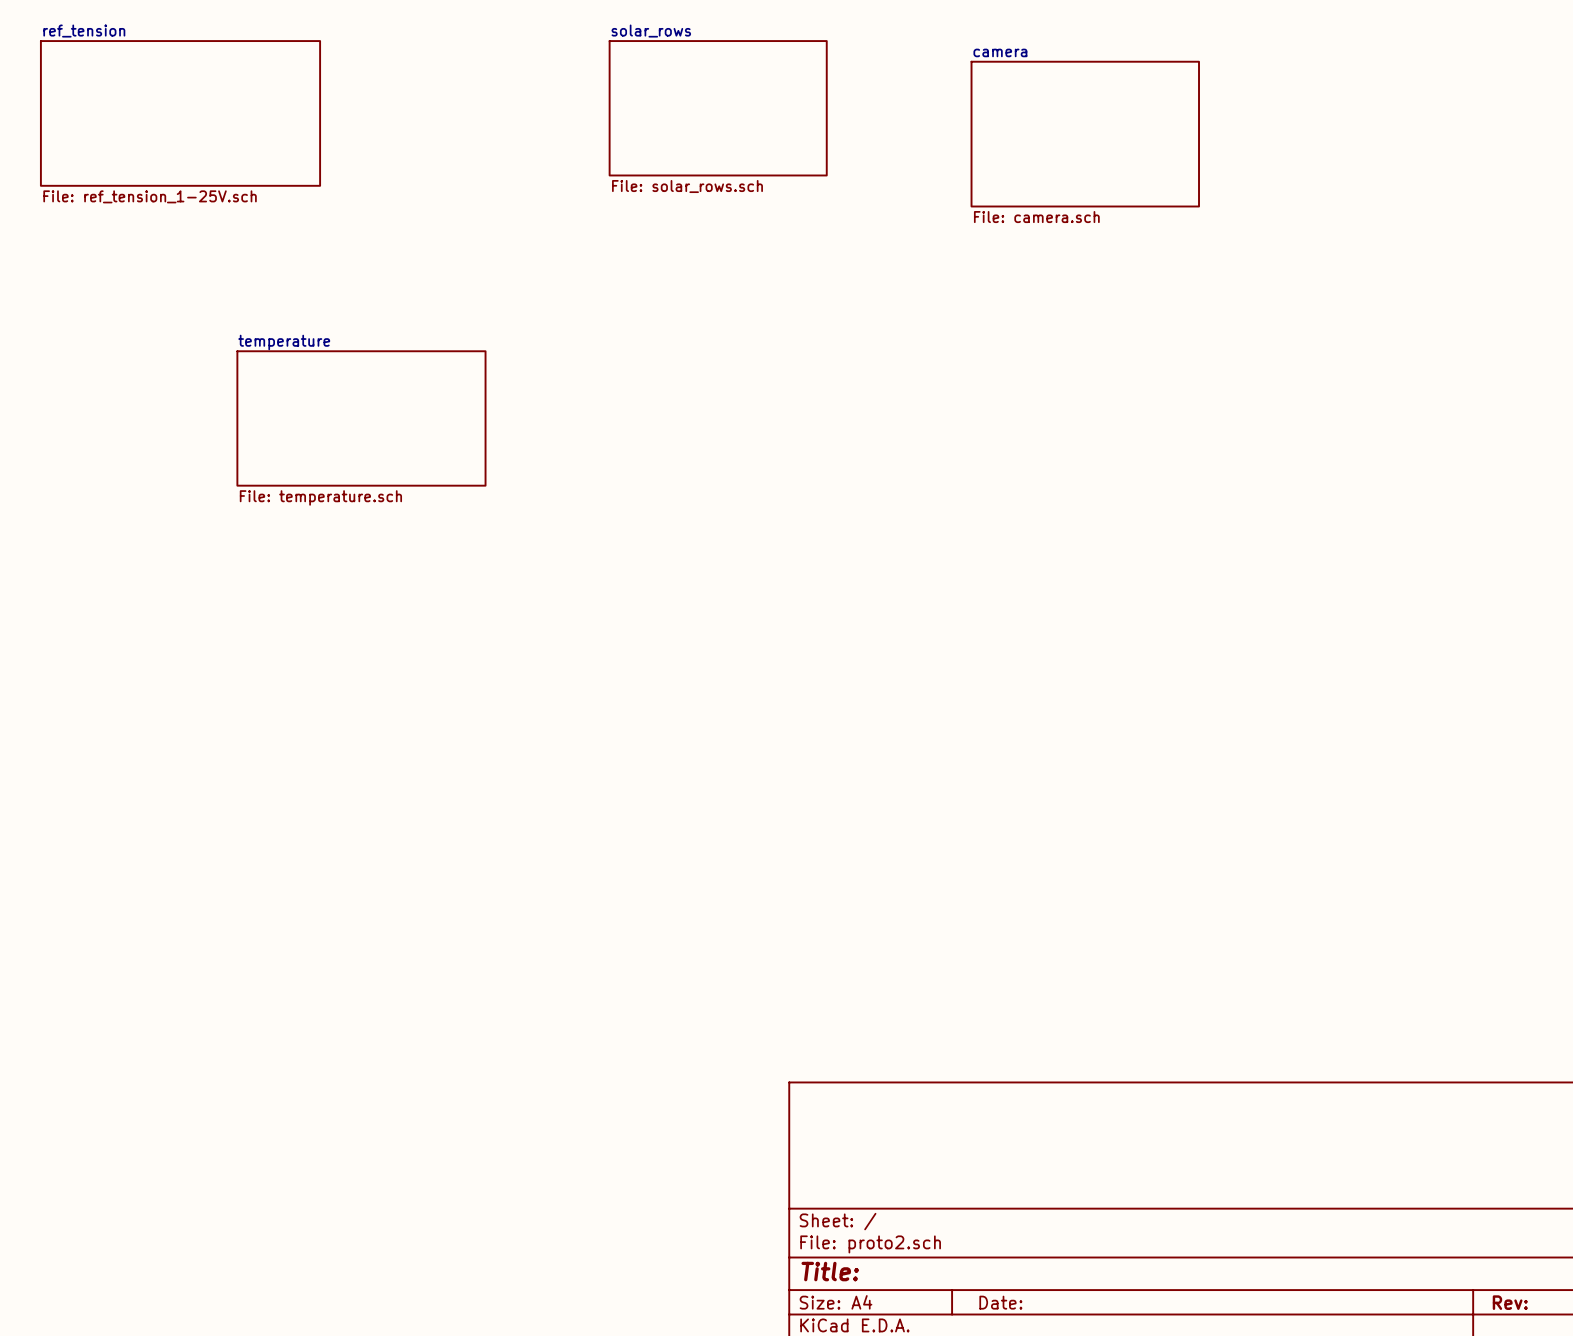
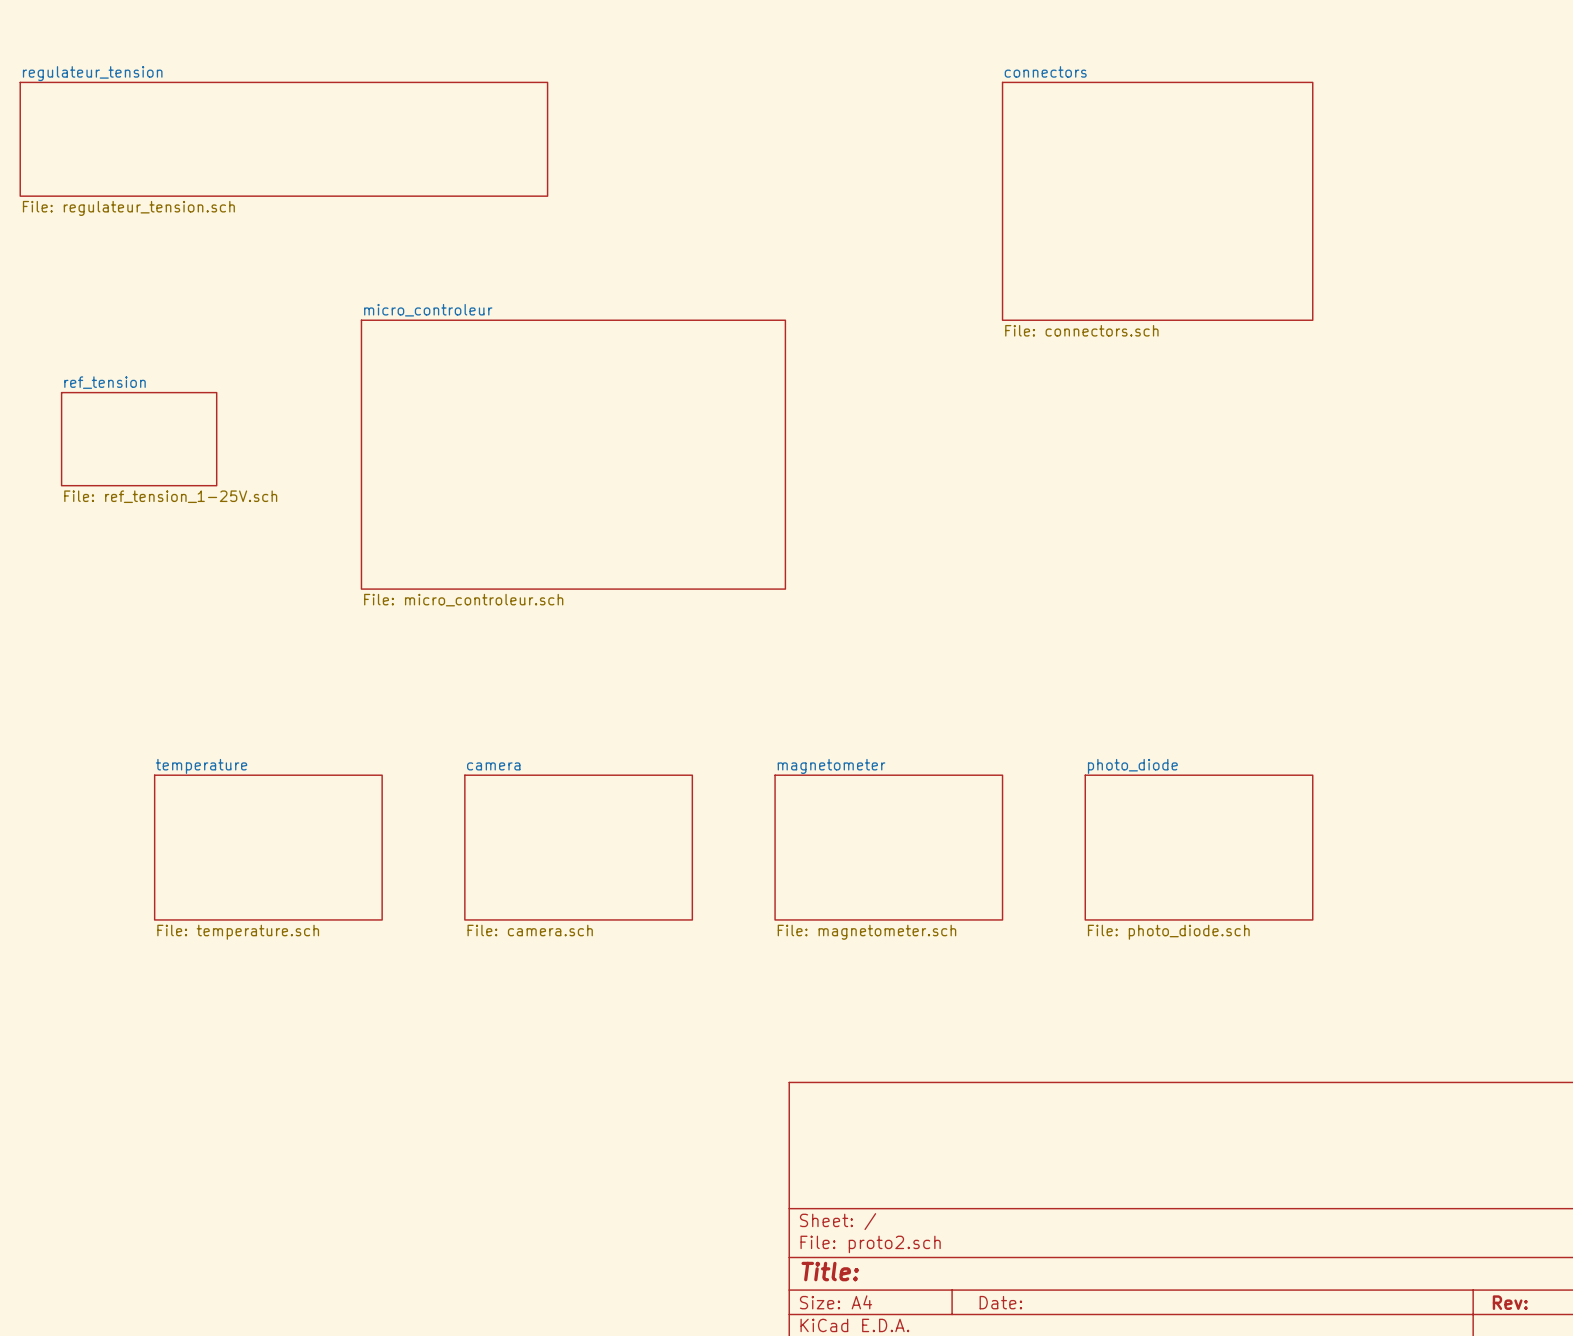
sheet solar_rows: File: solar_rows.sch (718, 108) -> none
sheet ref_tension: File: ref_tension_1-25V.sch (180, 113) -> none
sheet camera: File: camera.sch (1085, 134) -> none
sheet regulateur_tension: none -> File: regulateur_tension.sch (283, 139)
sheet connectors: none -> File: connectors.sch (1157, 201)
sheet temperature: File: temperature.sch (361, 418) -> none
sheet ref_tension: none -> File: ref_tension_1-25V.sch (139, 439)
sheet micro_controleur: none -> File: micro_controleur.sch (573, 454)
sheet temperature: none -> File: temperature.sch (268, 847)
sheet camera: none -> File: camera.sch (578, 847)
sheet magnetometer: none -> File: magnetometer.sch (888, 847)
sheet photo_diode: none -> File: photo_diode.sch (1199, 847)

